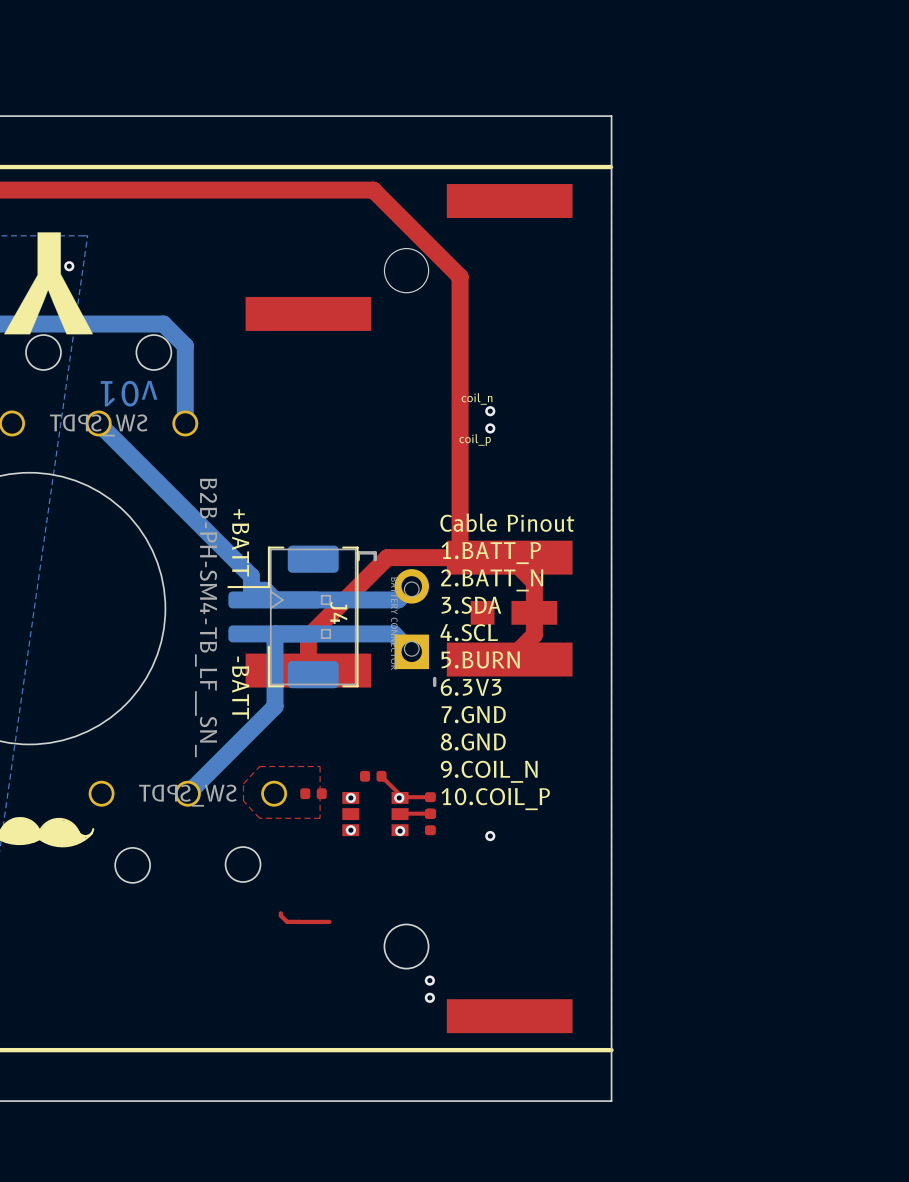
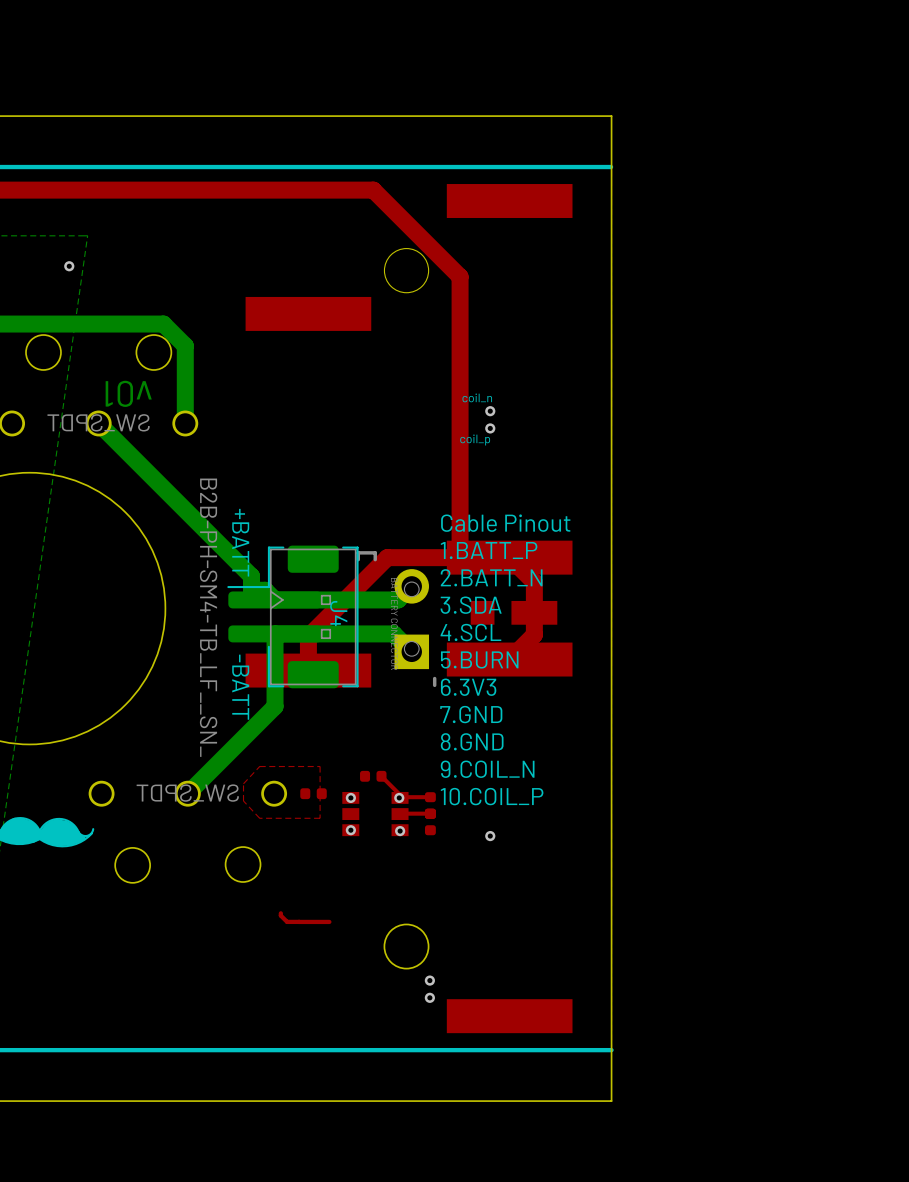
drawing: [4, 232, 93, 335] -> none

